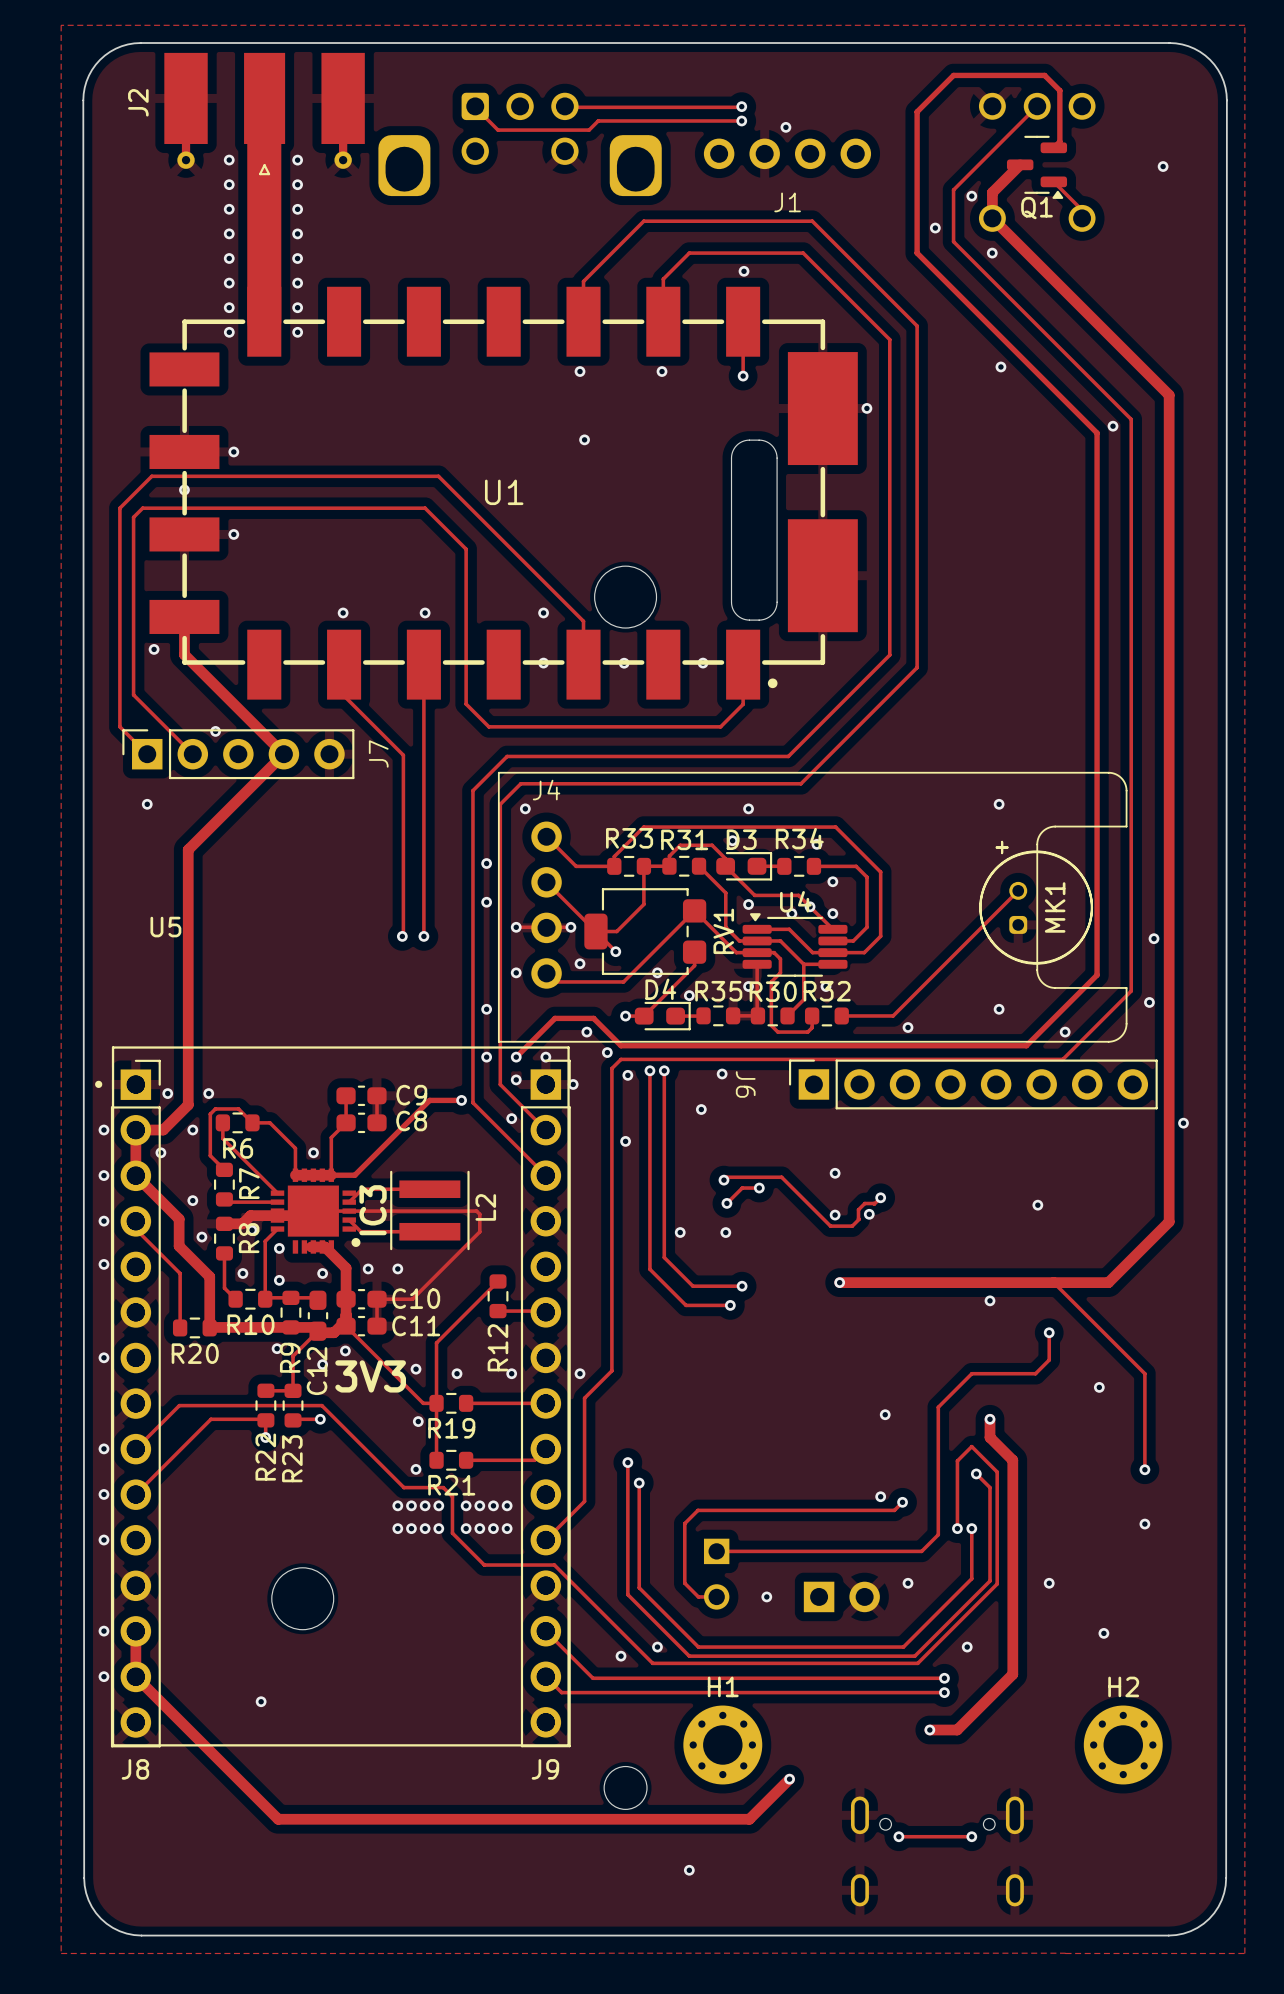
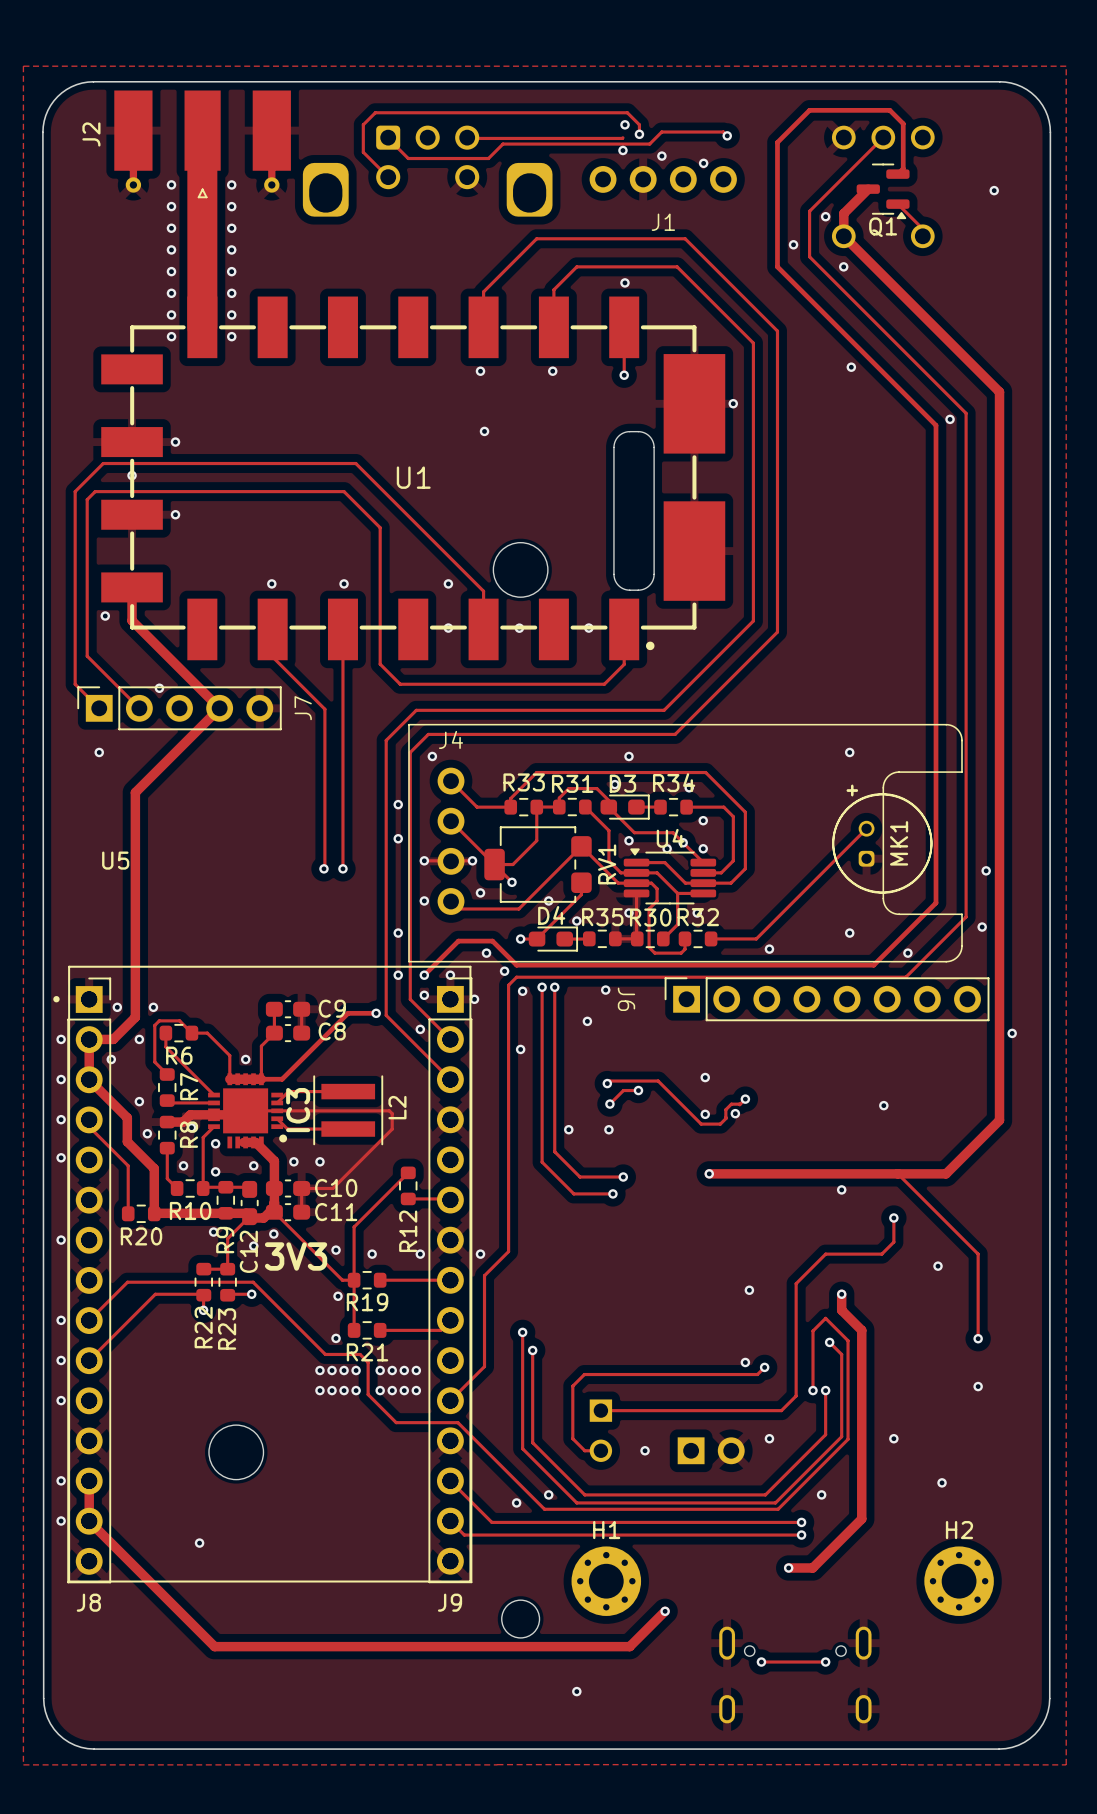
via: none -> (625, 124)
track: none -> (639, 134) (639, 124) (627, 112) (375, 112) (363, 124) (363, 152) (388, 177)
via: none -> (639, 134)
via: none -> (727, 135)
via: (741, 106) -> none
track: (598, 120) (741, 120) -> (496, 150) (502, 144) (649, 144) (661, 132) (723, 132) (727, 135)
via: none -> (703, 163)

